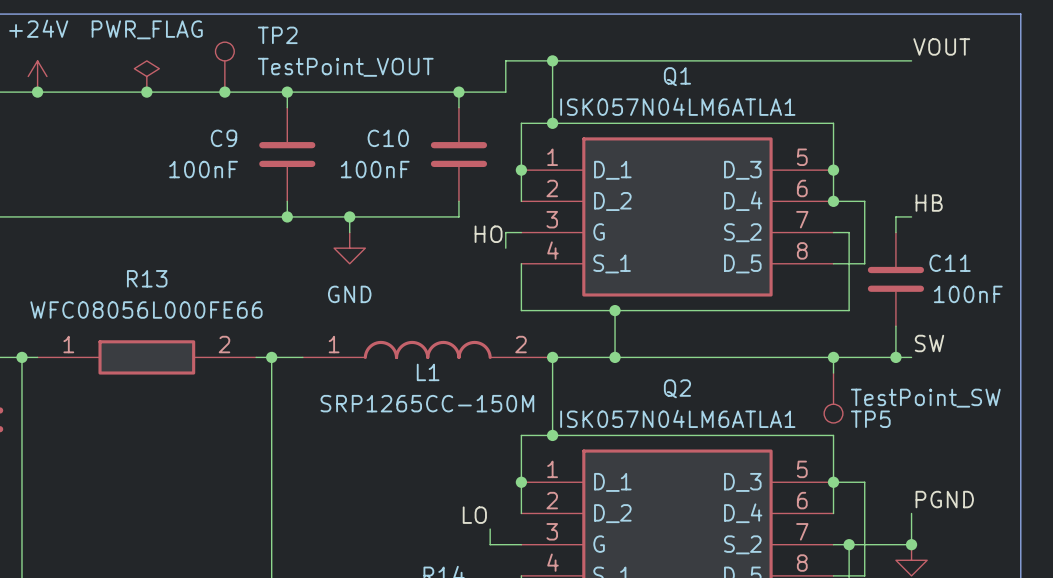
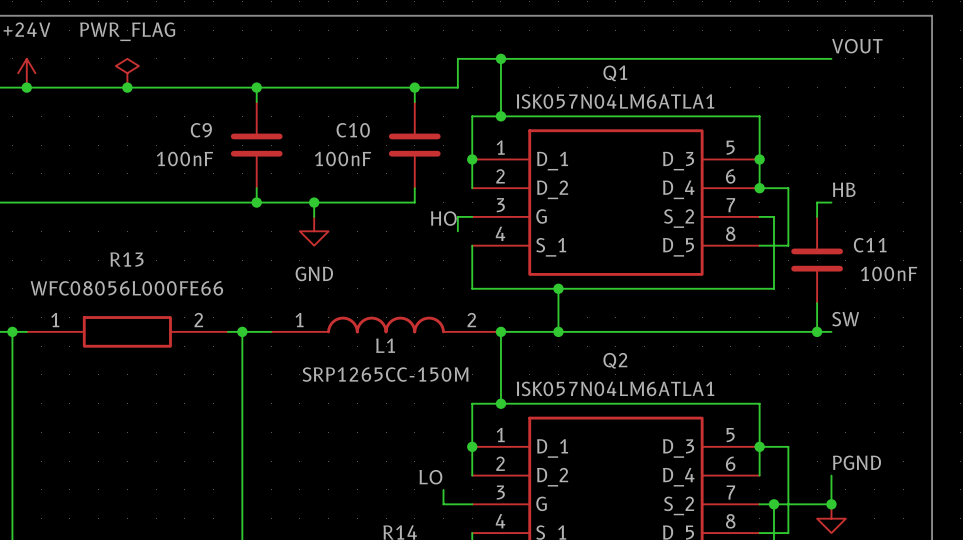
TP2: TestPoint_VOUT (224, 67) -> none
junction: (224, 92) -> none
wire: (833, 357) (833, 373) -> none
junction: (833, 357) -> none
TP5: TestPoint_SW (833, 397) -> none

